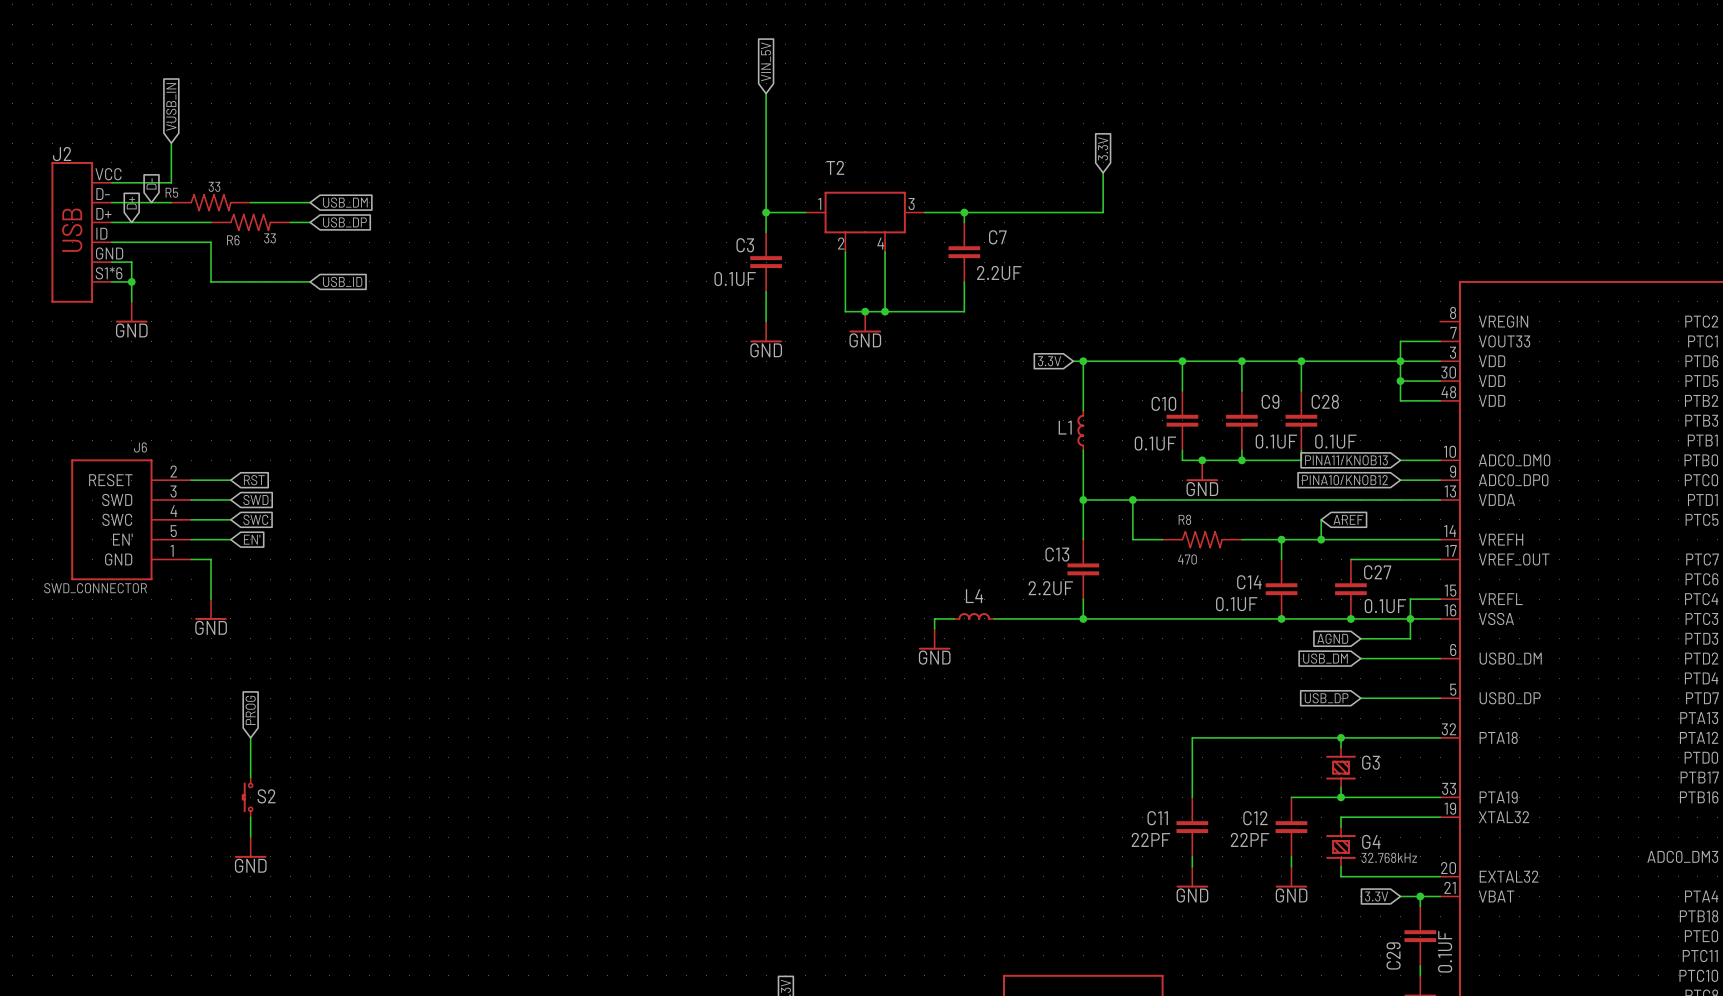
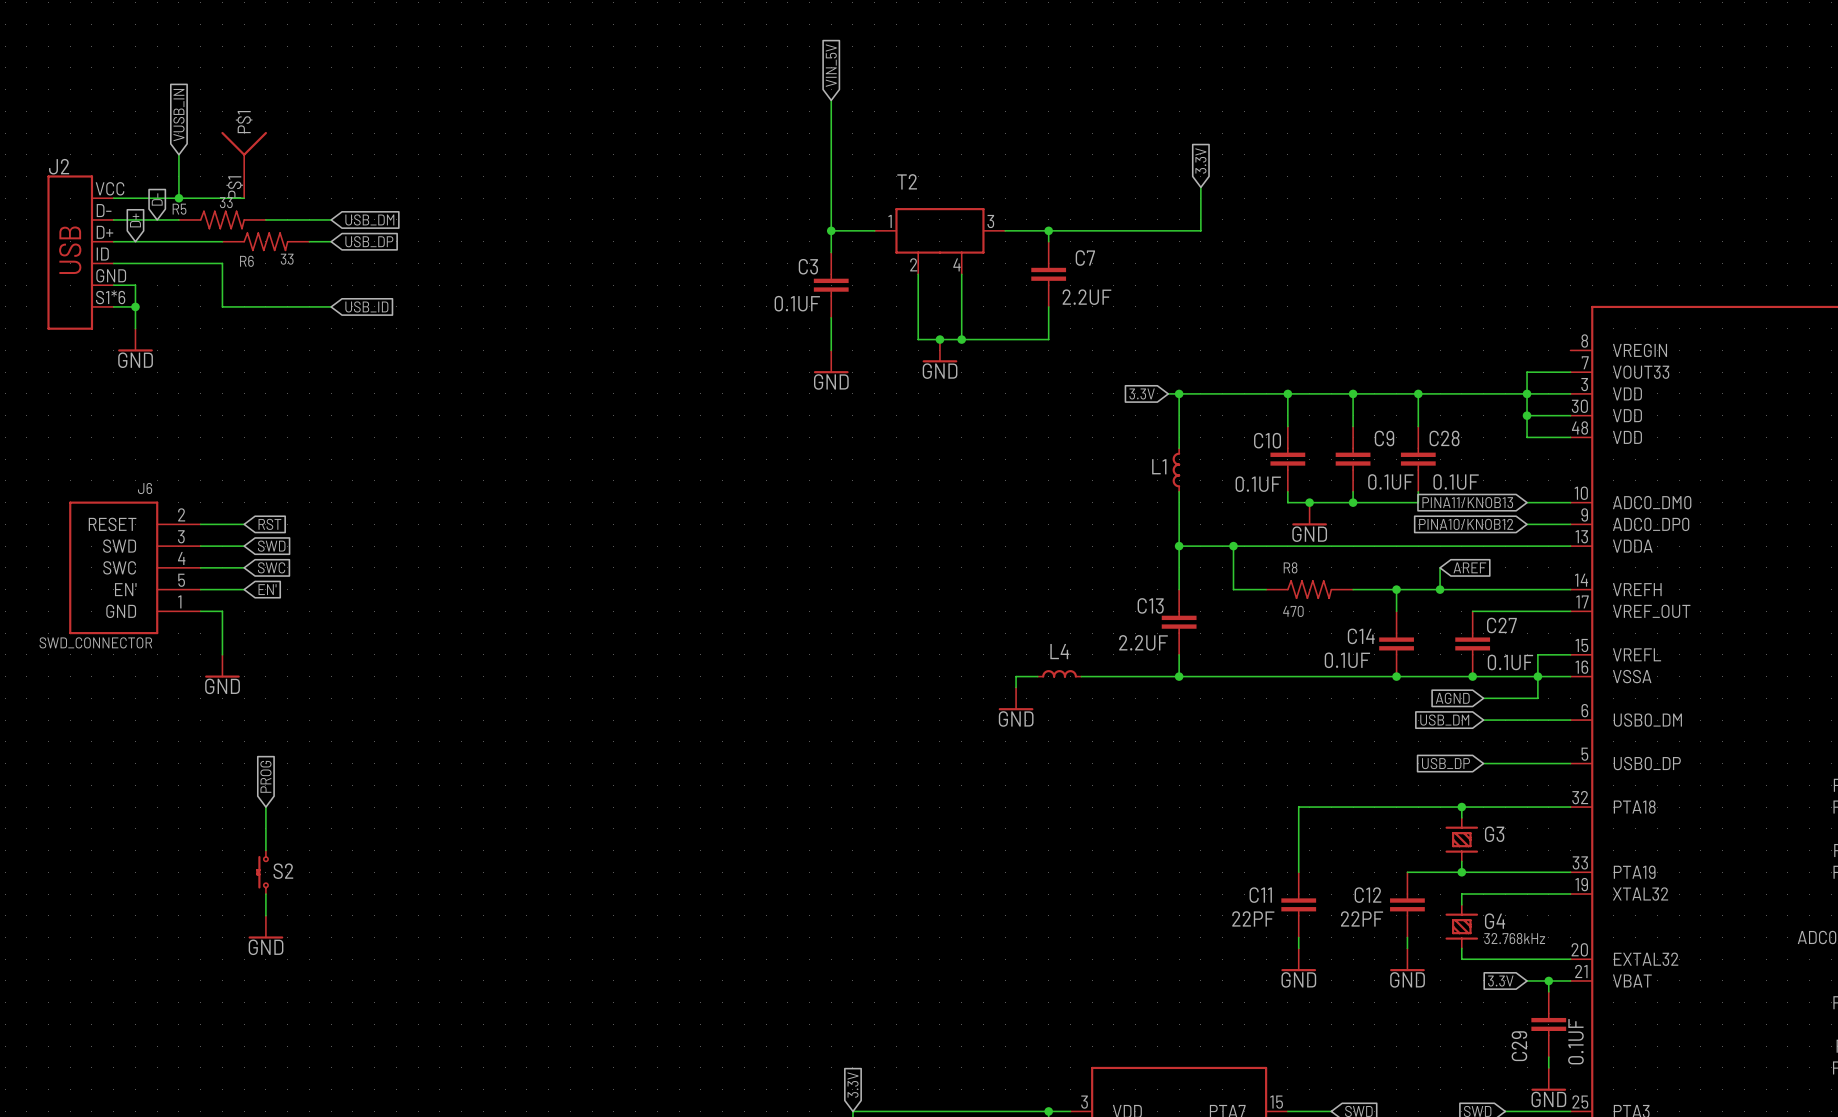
part: none -> (244, 165)
wire: none -> (178, 198) (244, 198)
junction: none -> (178, 198)

